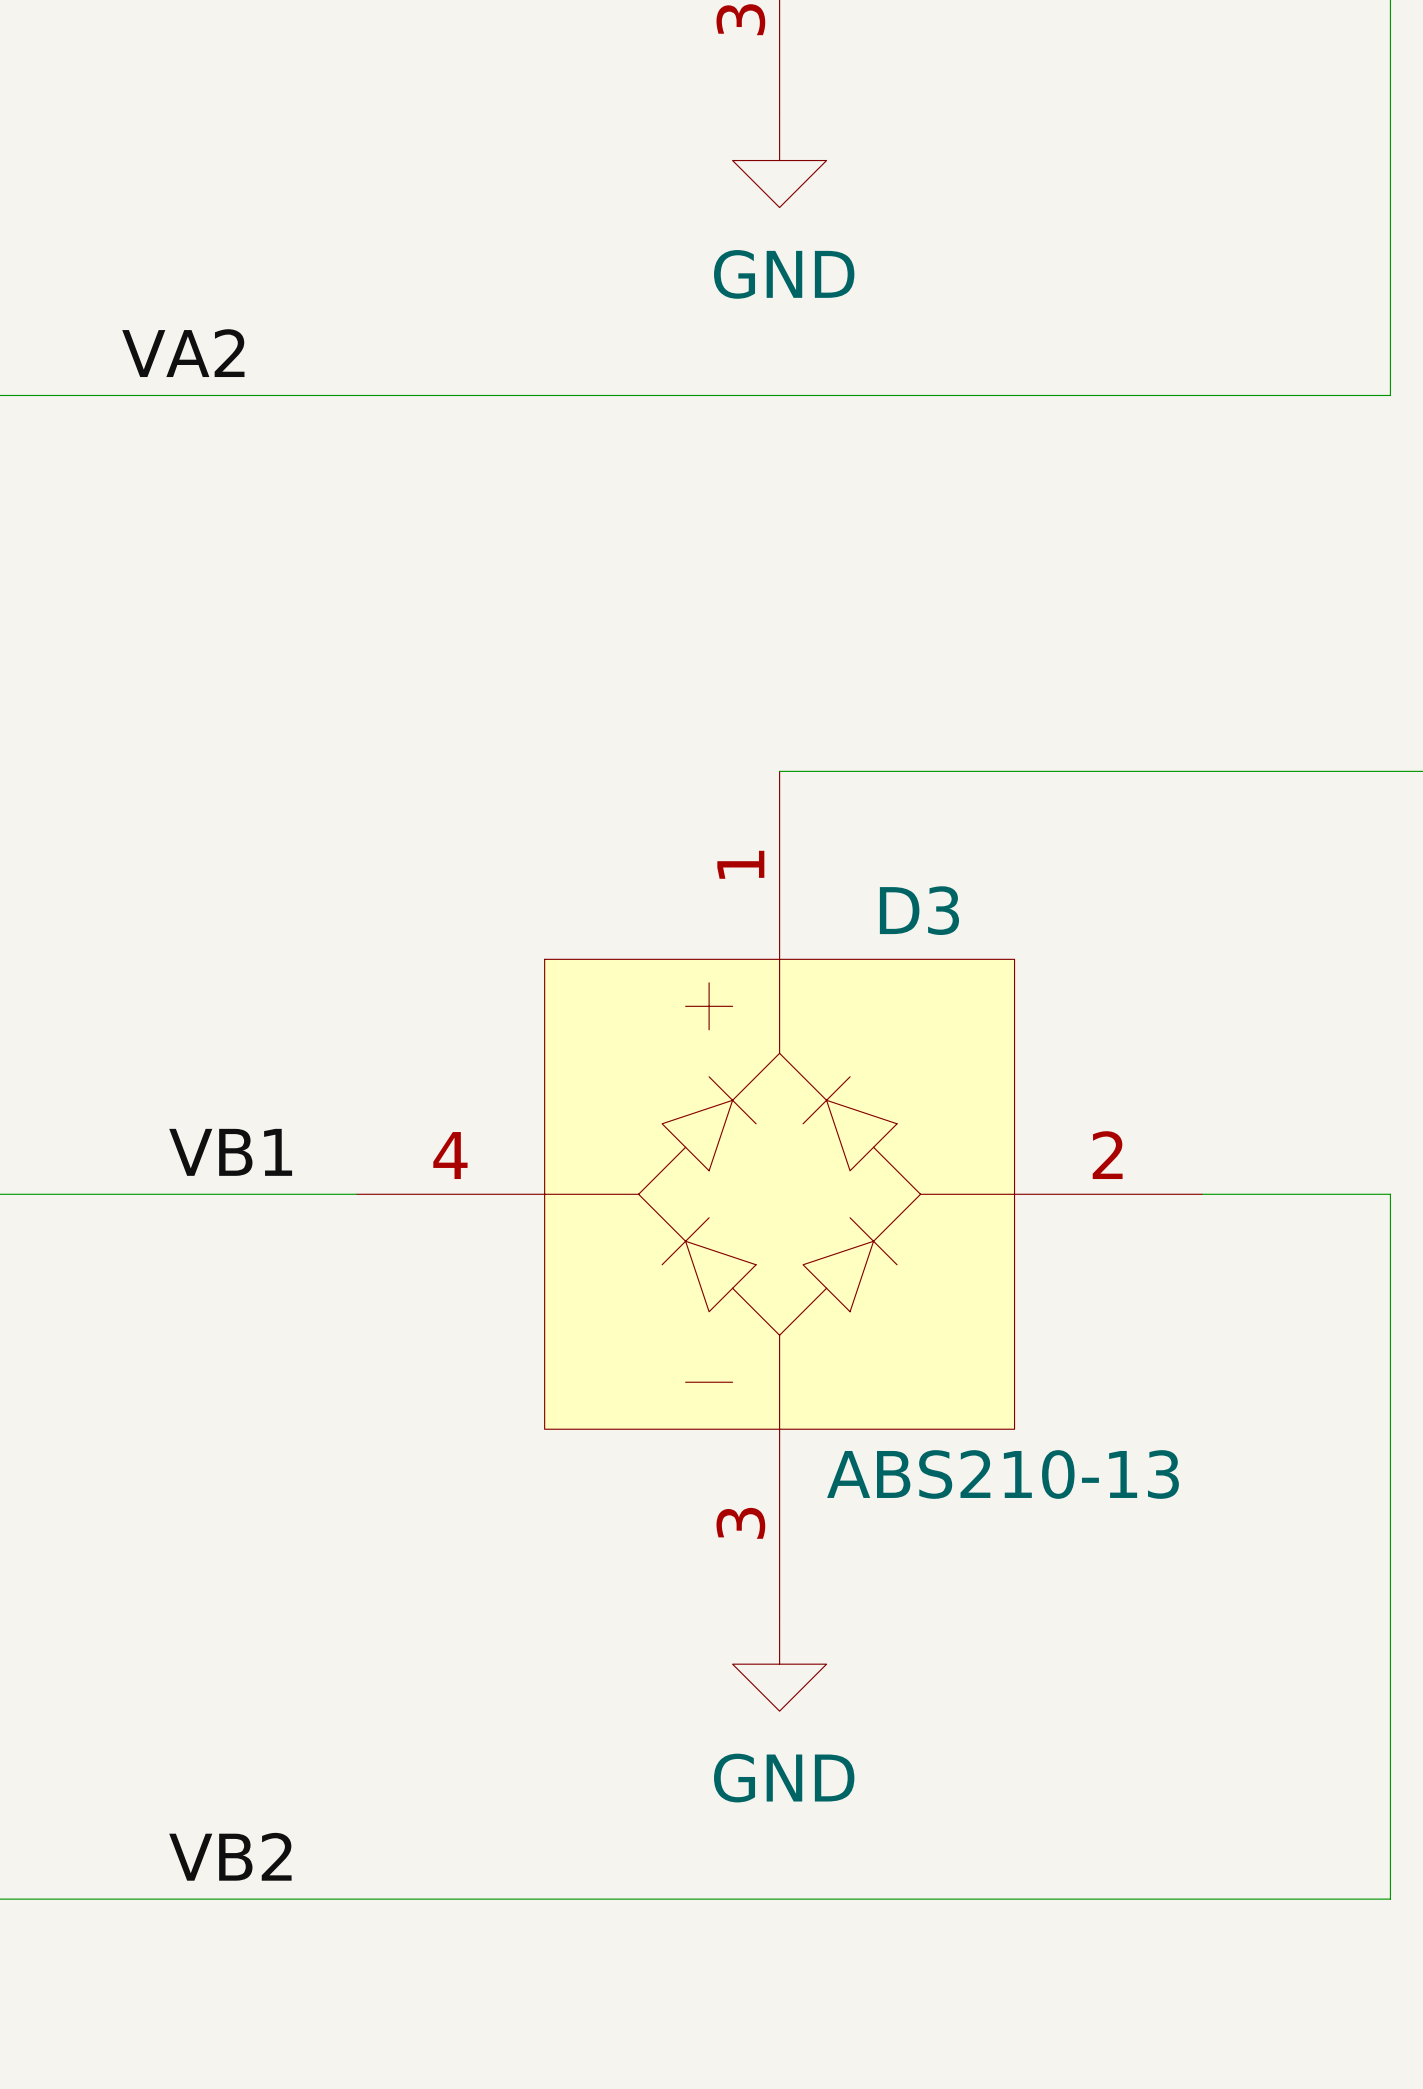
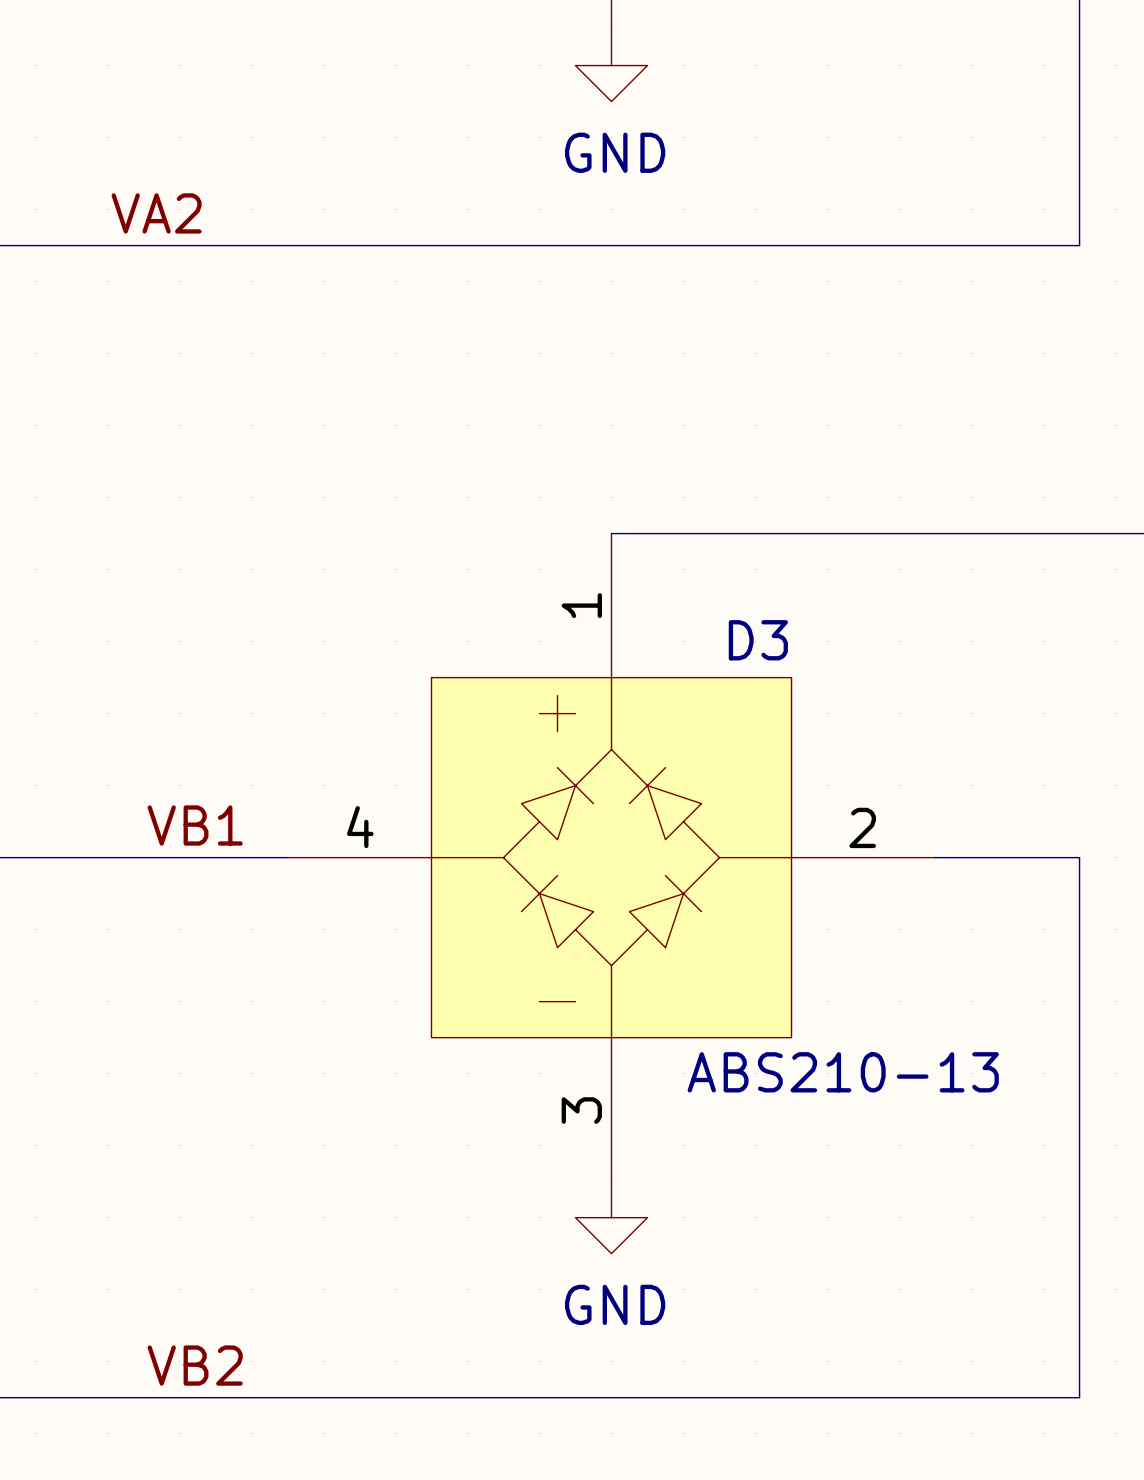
D3 name position: D3 (919, 910) -> D3 (758, 640)
D3 text position: ABS210-13 (1002, 1474) -> ABS210-13 (843, 1072)

